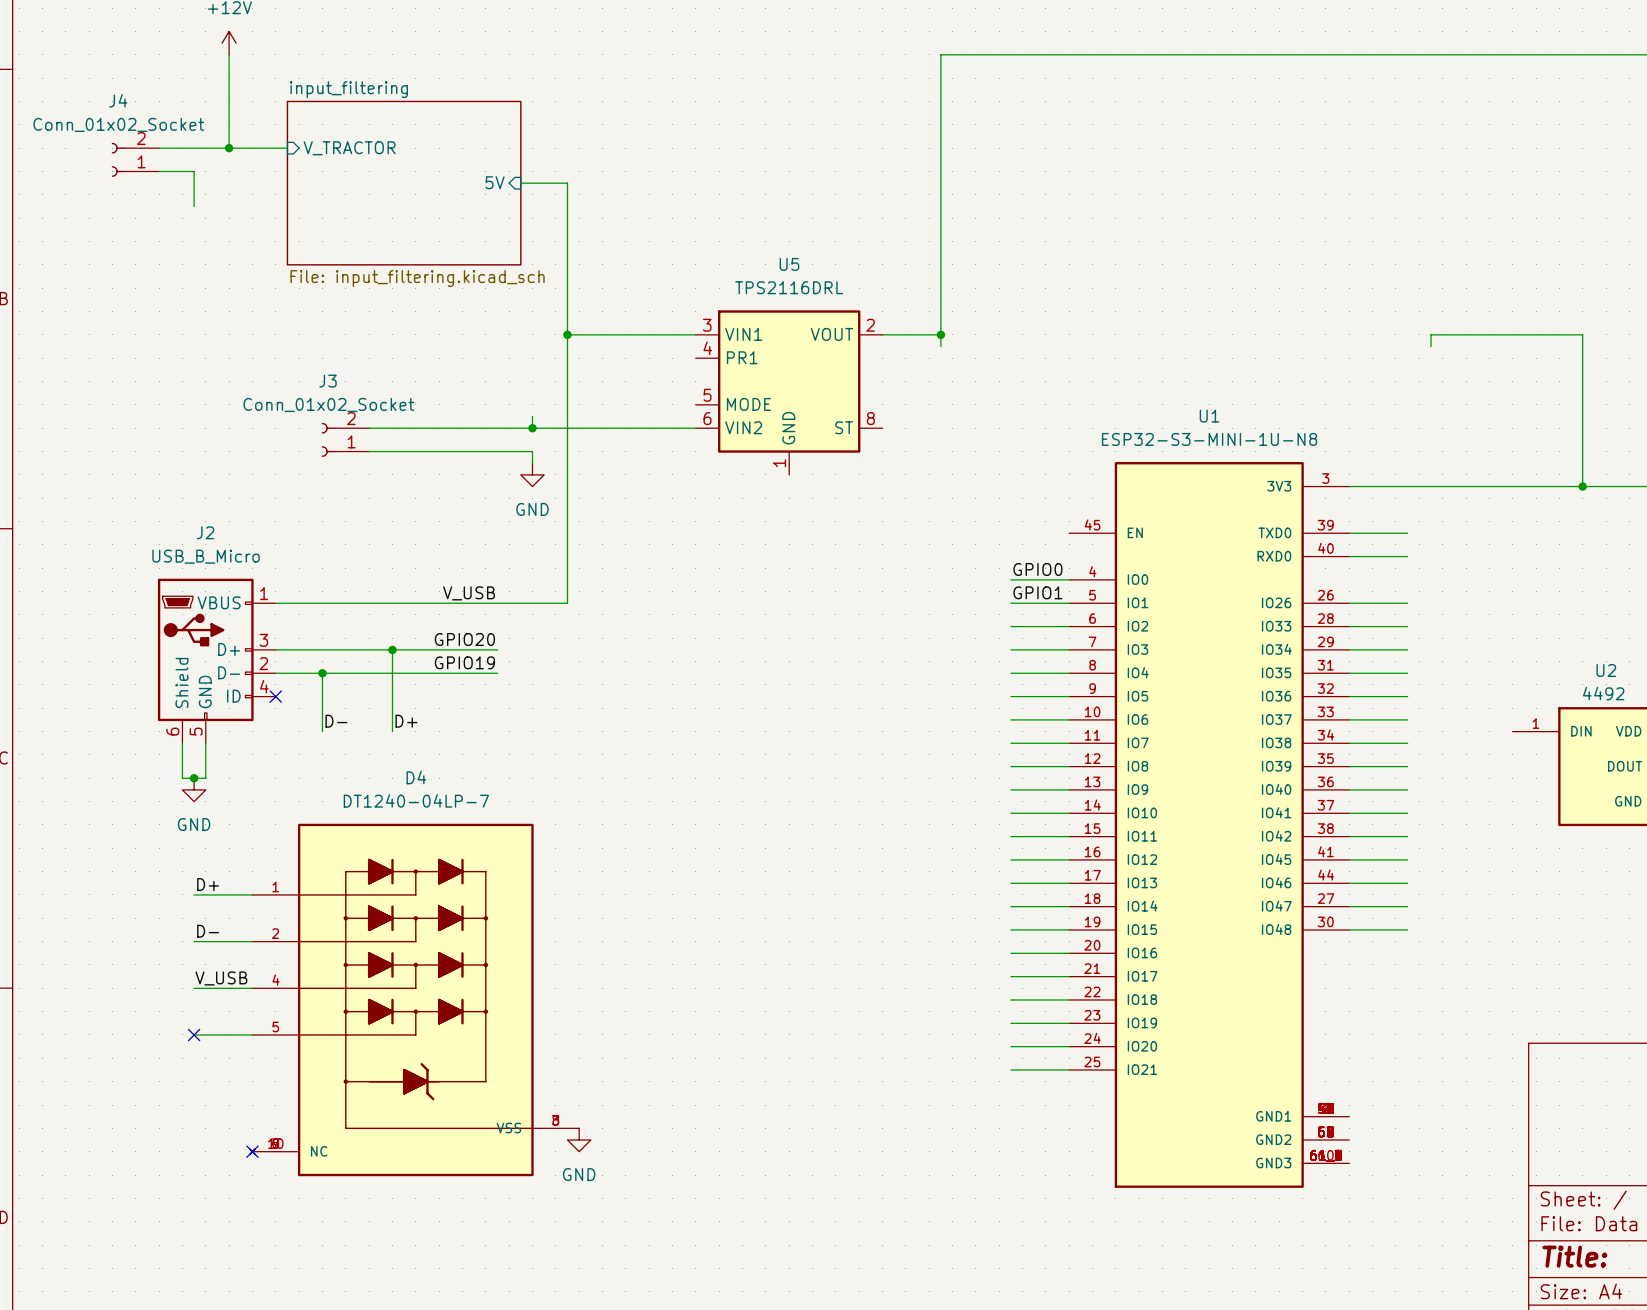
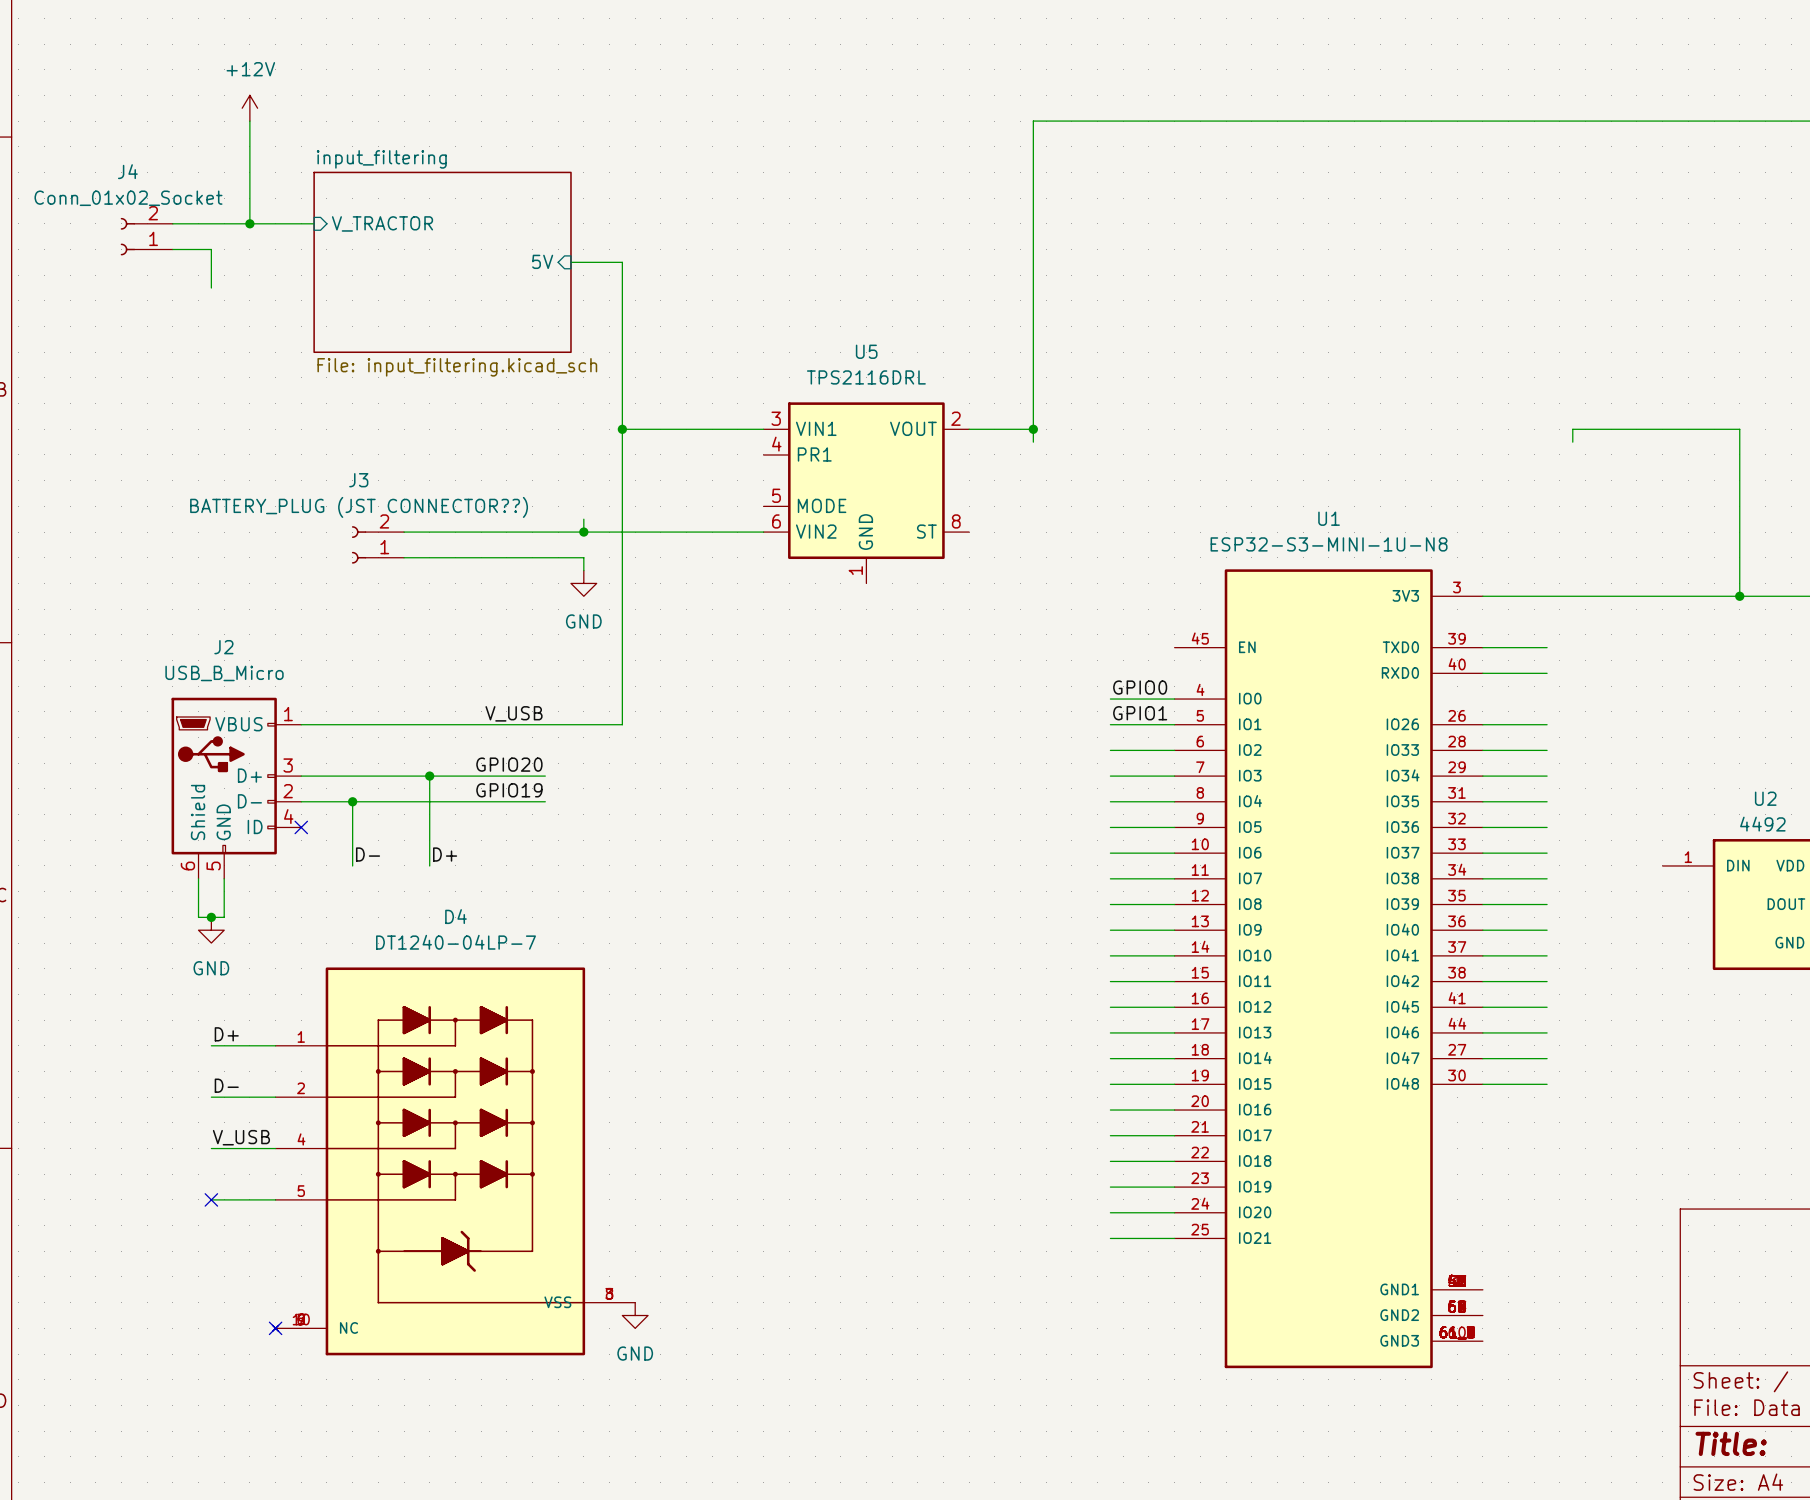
J3 value: Conn_01x02_Socket (328, 404) -> BATTERY_PLUG (JST CONNECTOR??) (359, 507)

